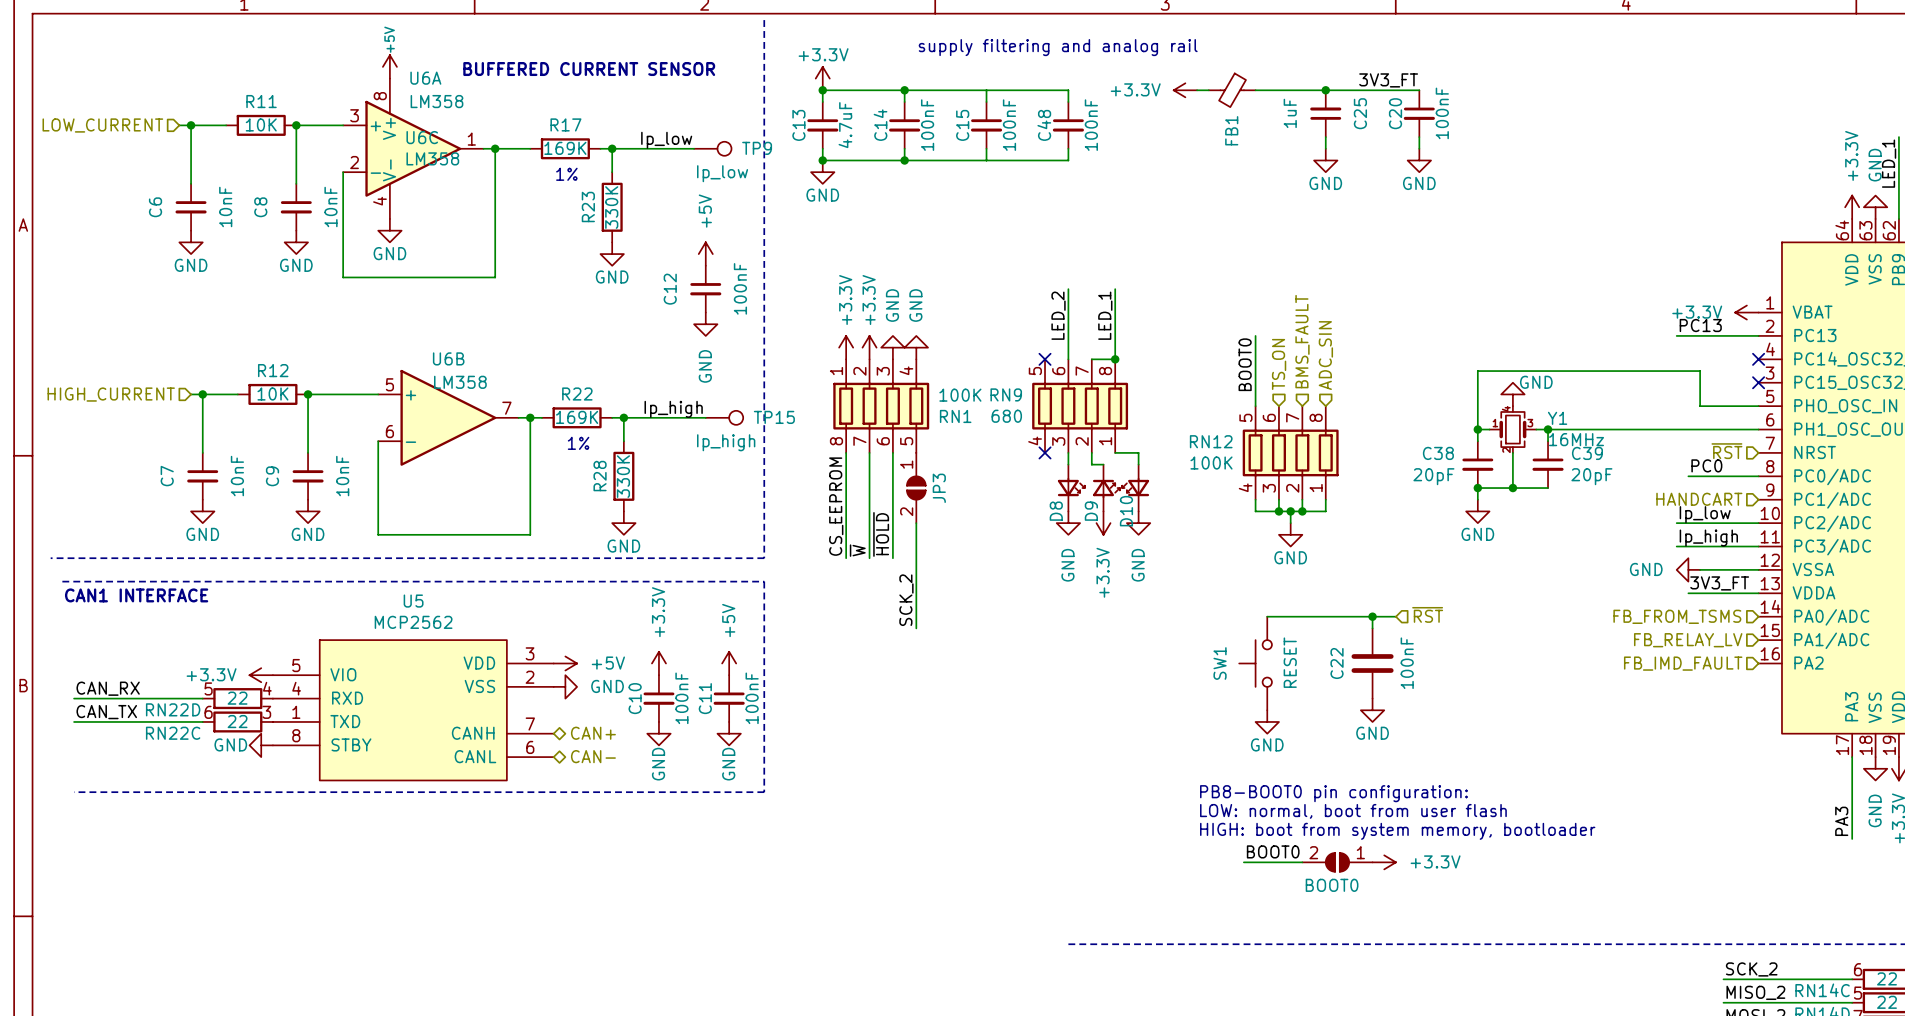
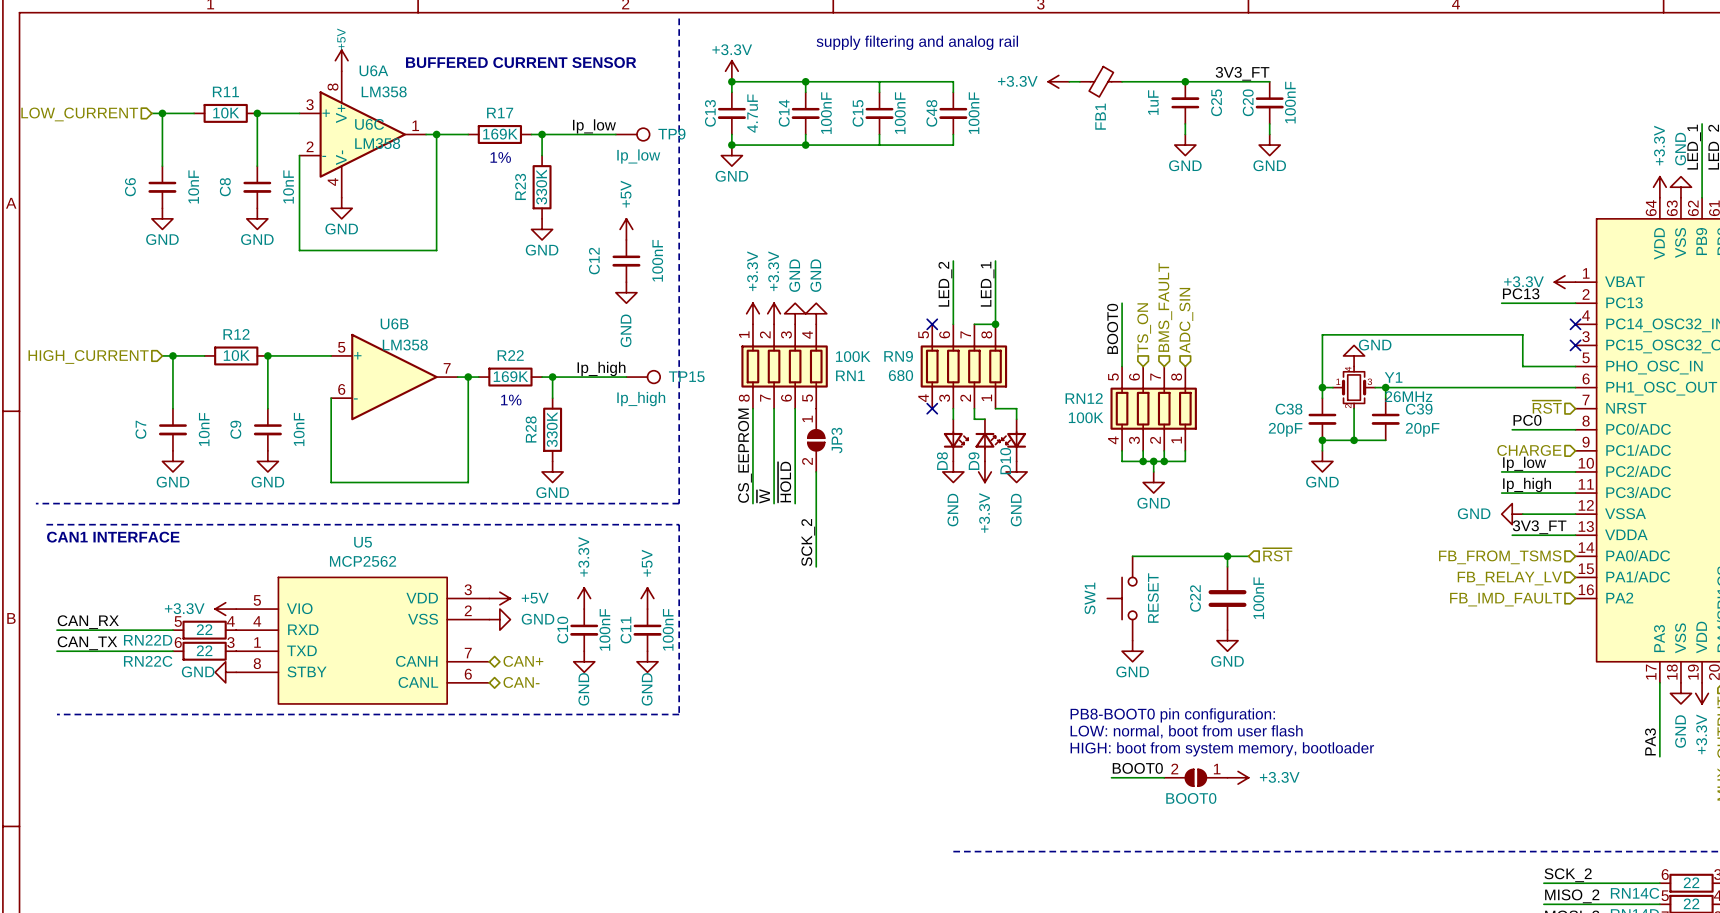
Y1 value: 16MHz (1576, 439) -> 26MHz (1408, 396)
hierarchical label: HANDCART (1699, 499) -> CHARGE (1529, 450)

